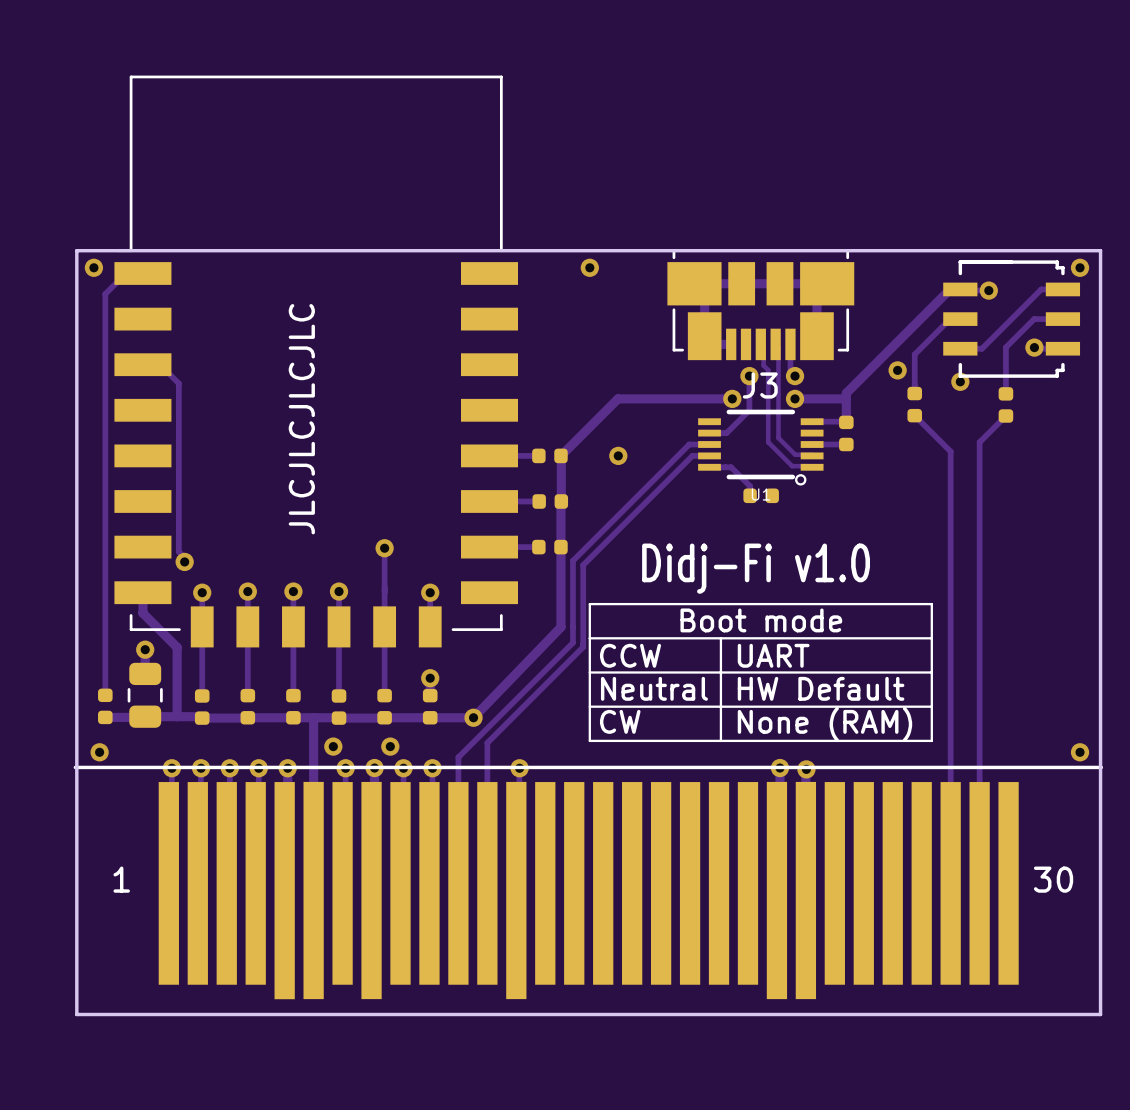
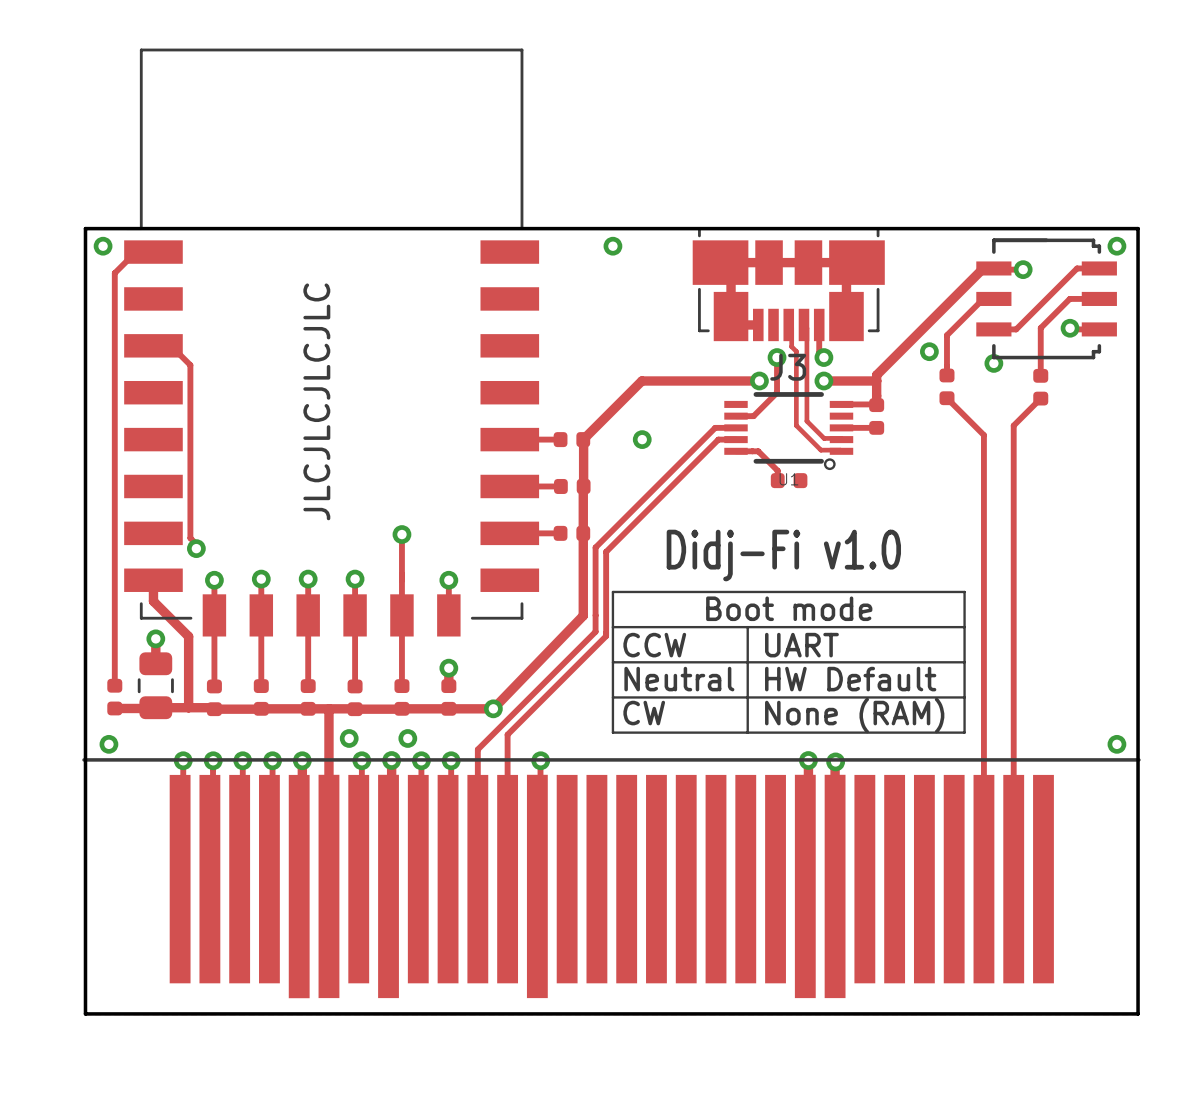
part text: 1 (121, 879) -> none
part text: 30 (1053, 879) -> none

